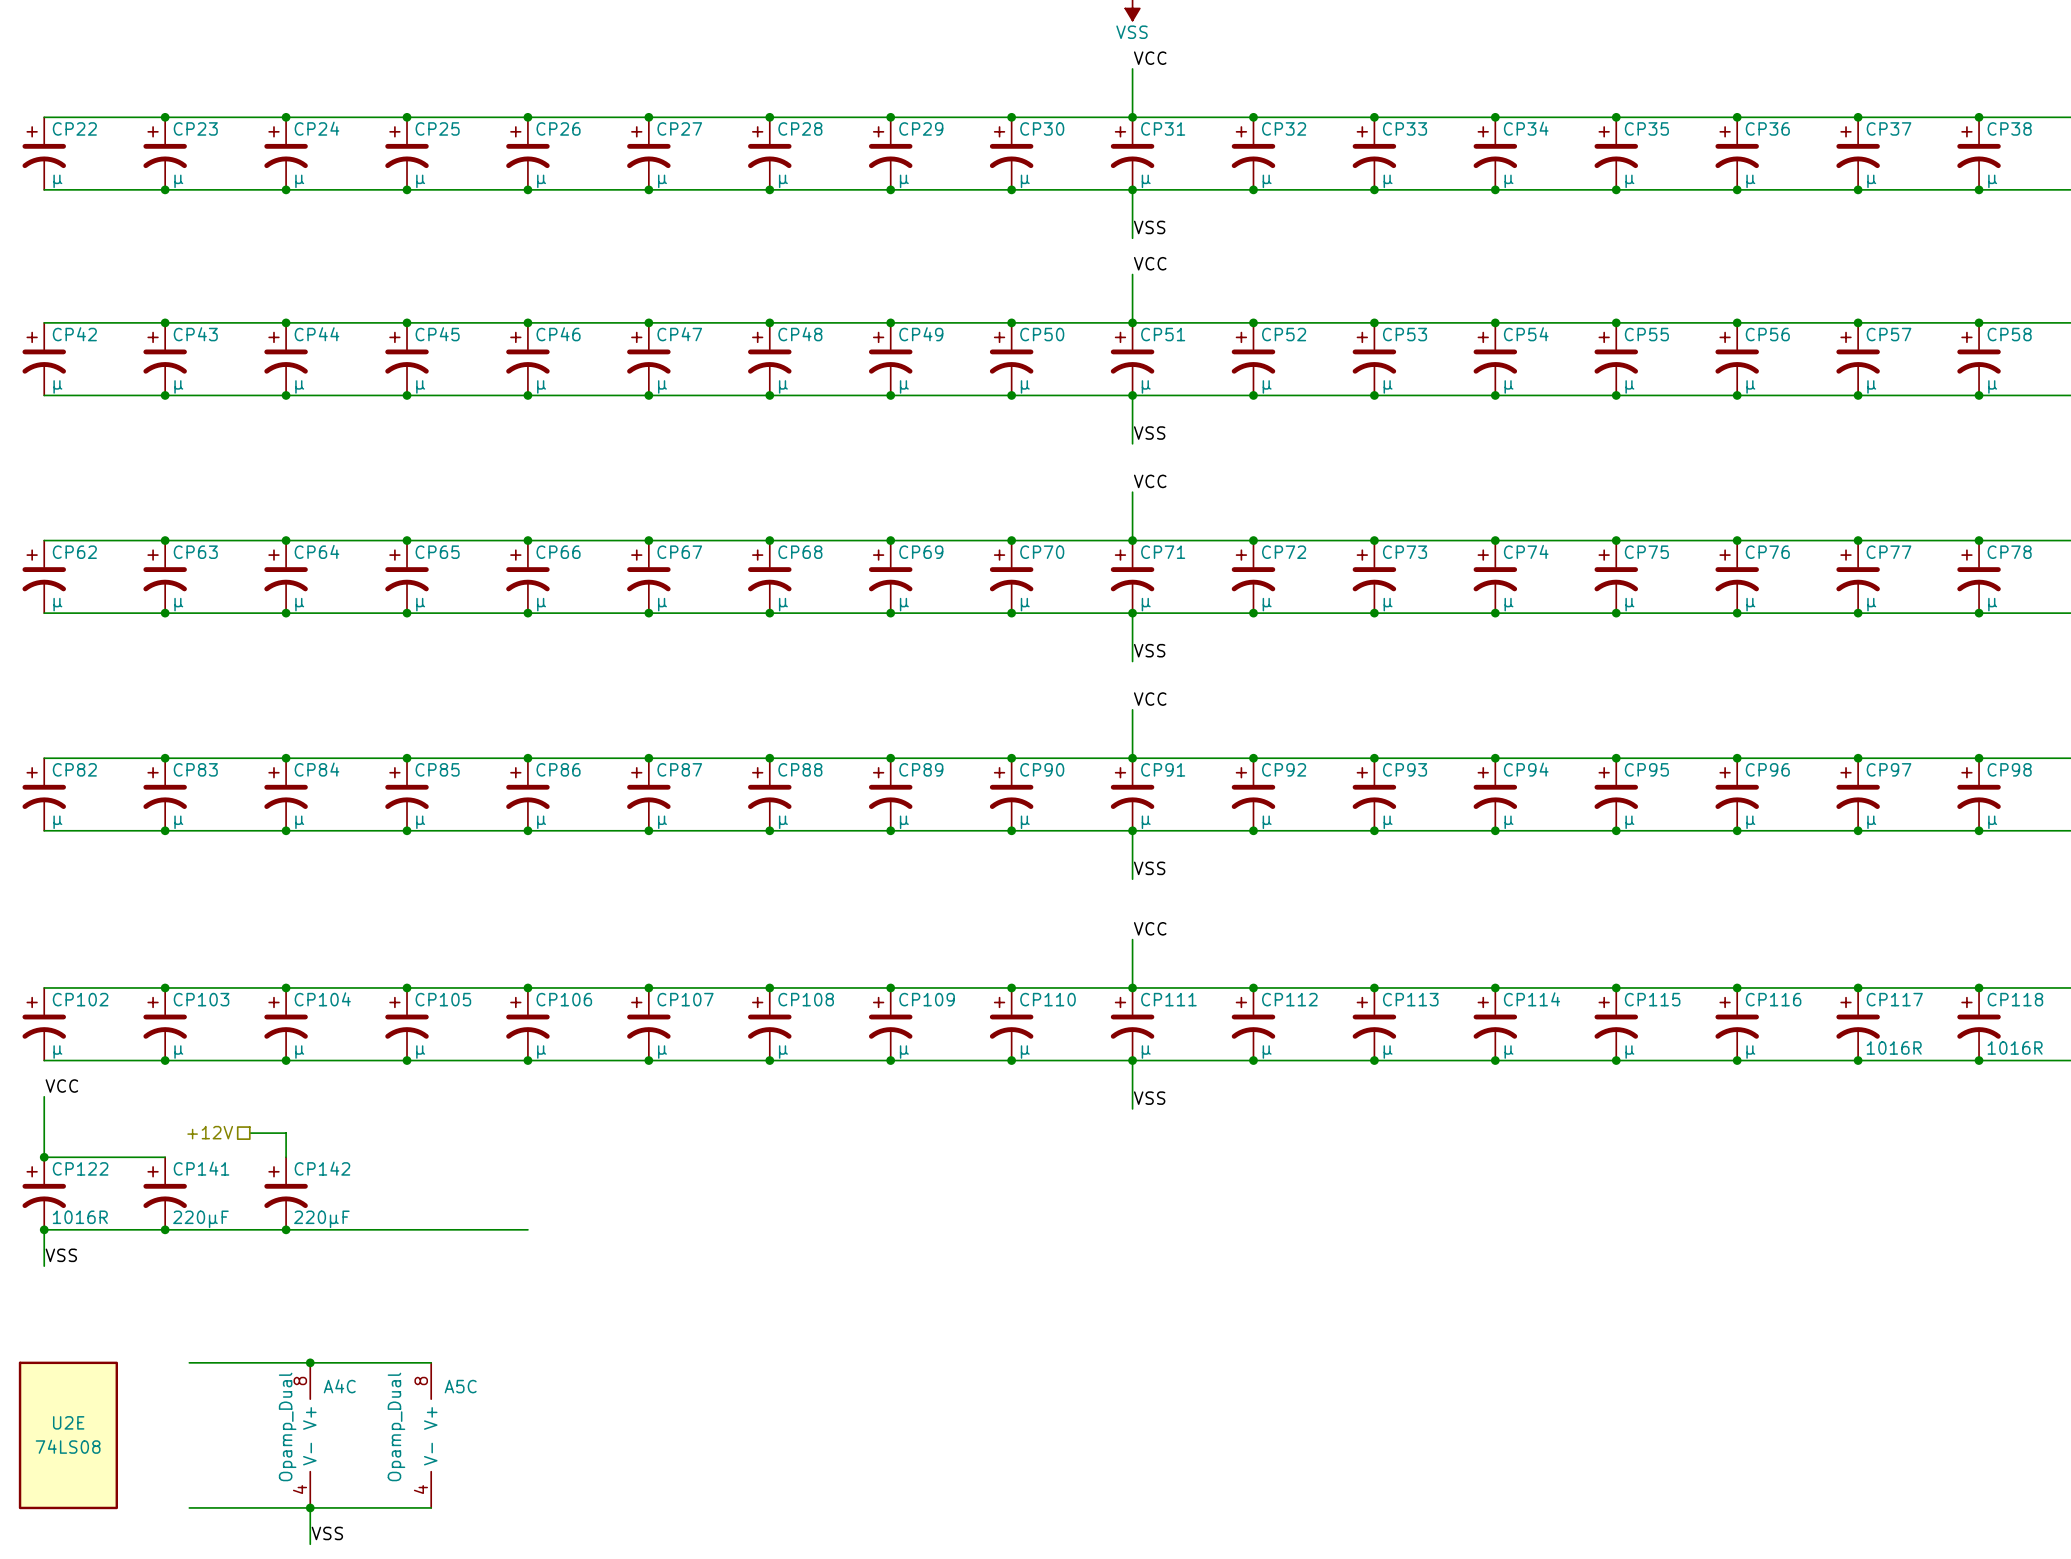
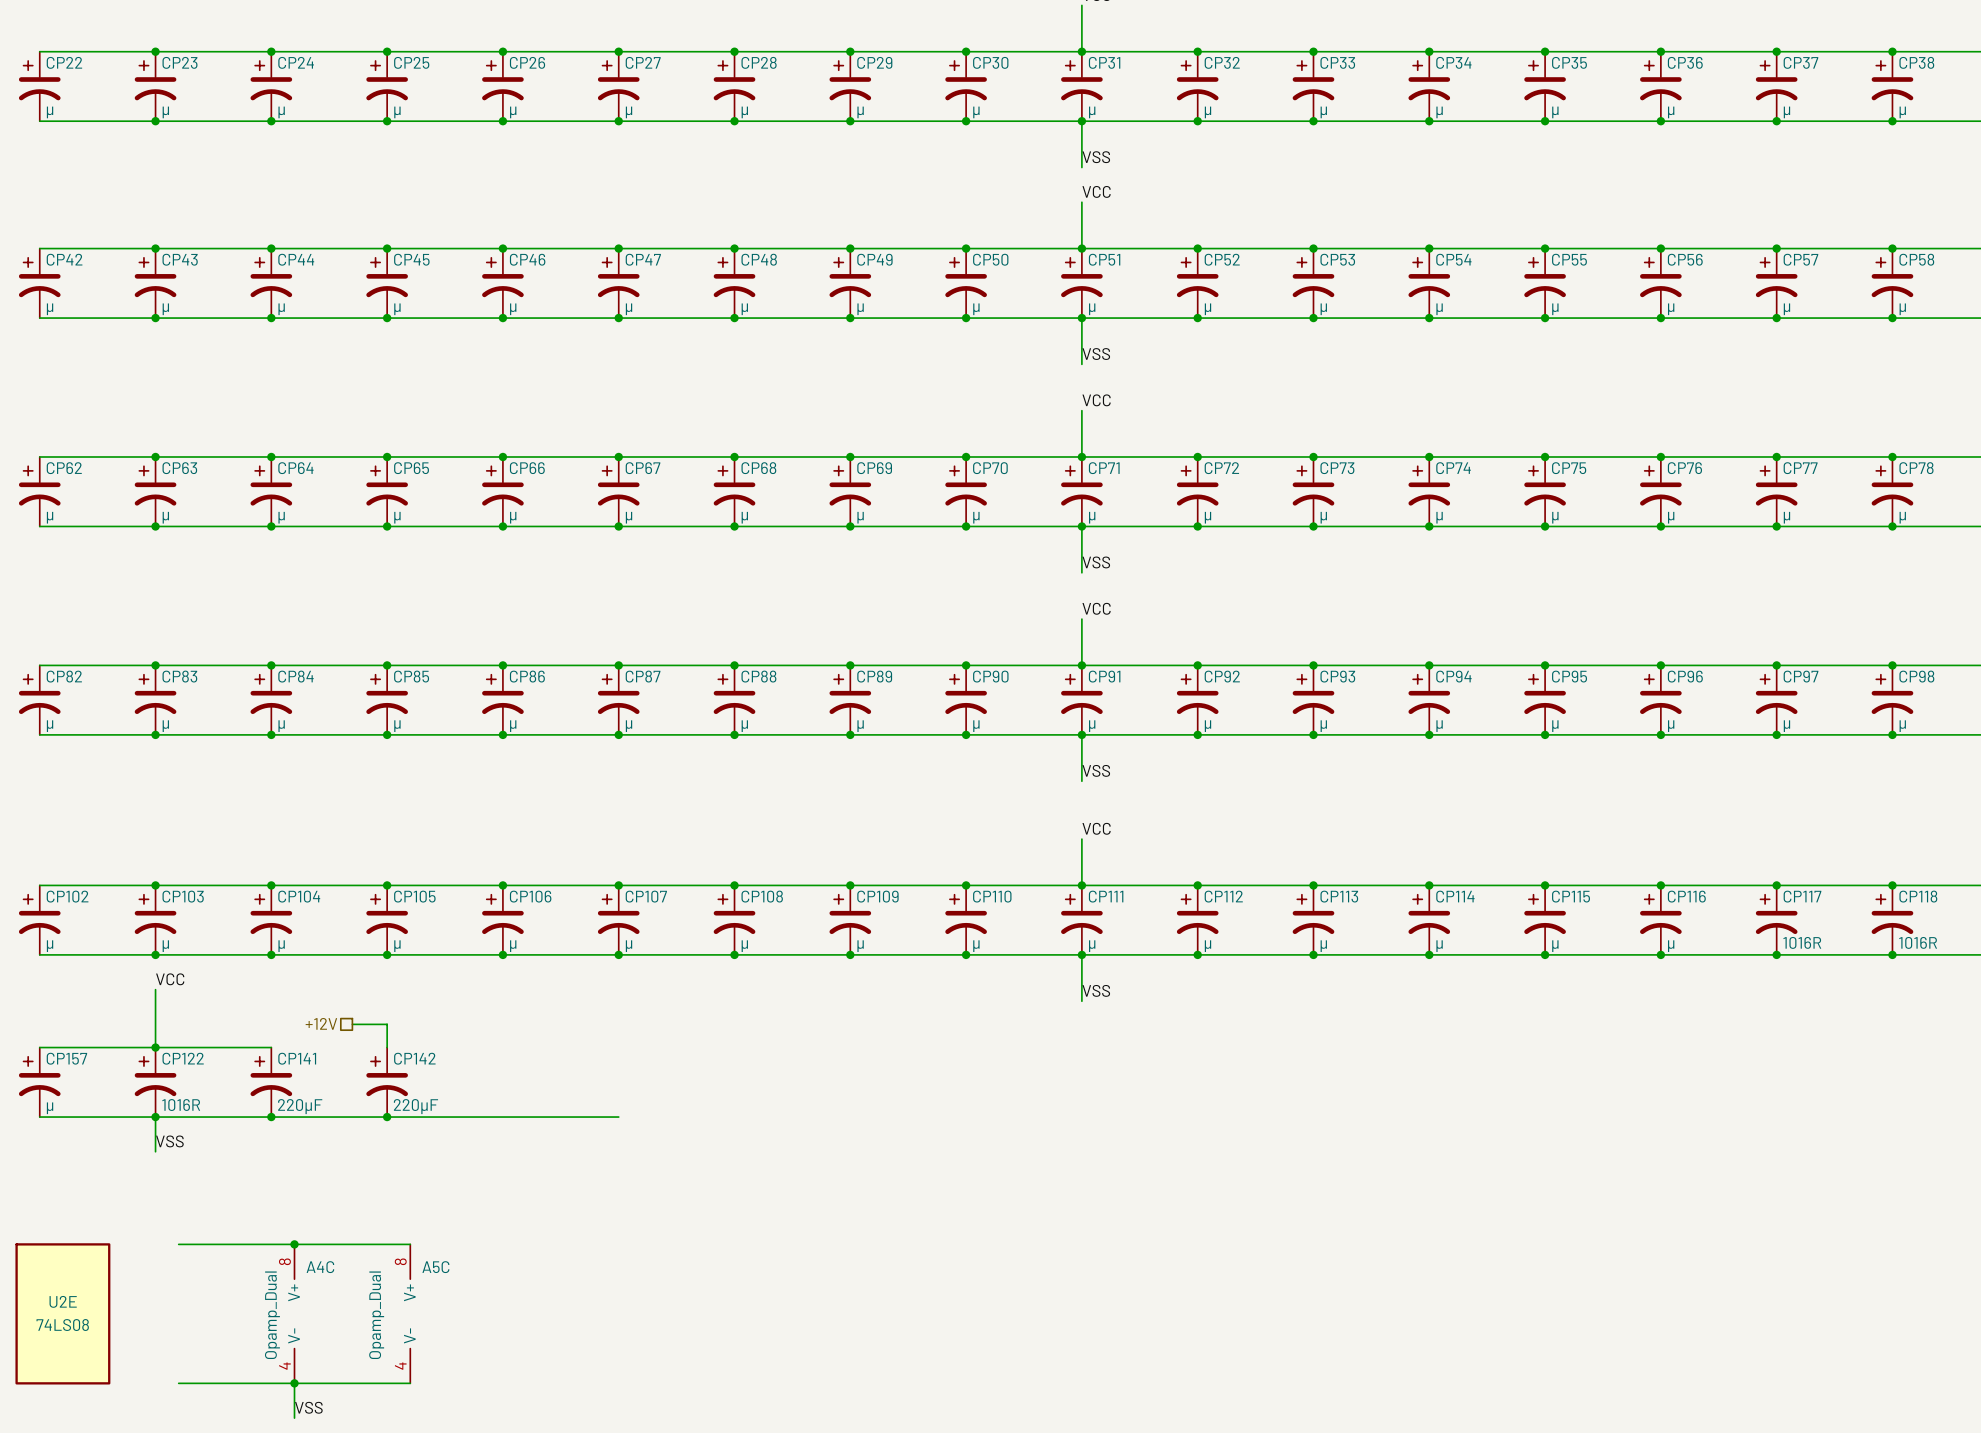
label position: VCC (61, 1086) -> VCC (170, 979)
wire: (44, 1096) (44, 1157) -> none
hierarchical label position: +12V (210, 1132) -> +12V (321, 1023)
wire: (249, 1133) (286, 1133) (286, 1157) -> (155, 989) (155, 1047) (271, 1047)
wire: none -> (352, 1024) (387, 1024) (387, 1047)
junction: (44, 1157) -> none
junction: none -> (155, 1047)
CP122 name: CP122 (80, 1168) -> CP157 (66, 1058)
CP141 name: CP141 (201, 1168) -> CP122 (183, 1058)
CP142 name: CP142 (322, 1168) -> CP141 (297, 1058)
CP142: none -> 220μF (387, 1082)
CP122 value: 1016R (80, 1217) -> μ (50, 1108)
CP141 value: 220μF (200, 1219) -> 1016R (181, 1105)
wire: (44, 1229) (44, 1266) -> (155, 1117) (155, 1151)
junction: (44, 1229) -> none
junction: none -> (387, 1117)
wire: none -> (502, 1117) (618, 1117)
label position: VSS (61, 1255) -> VSS (169, 1141)

